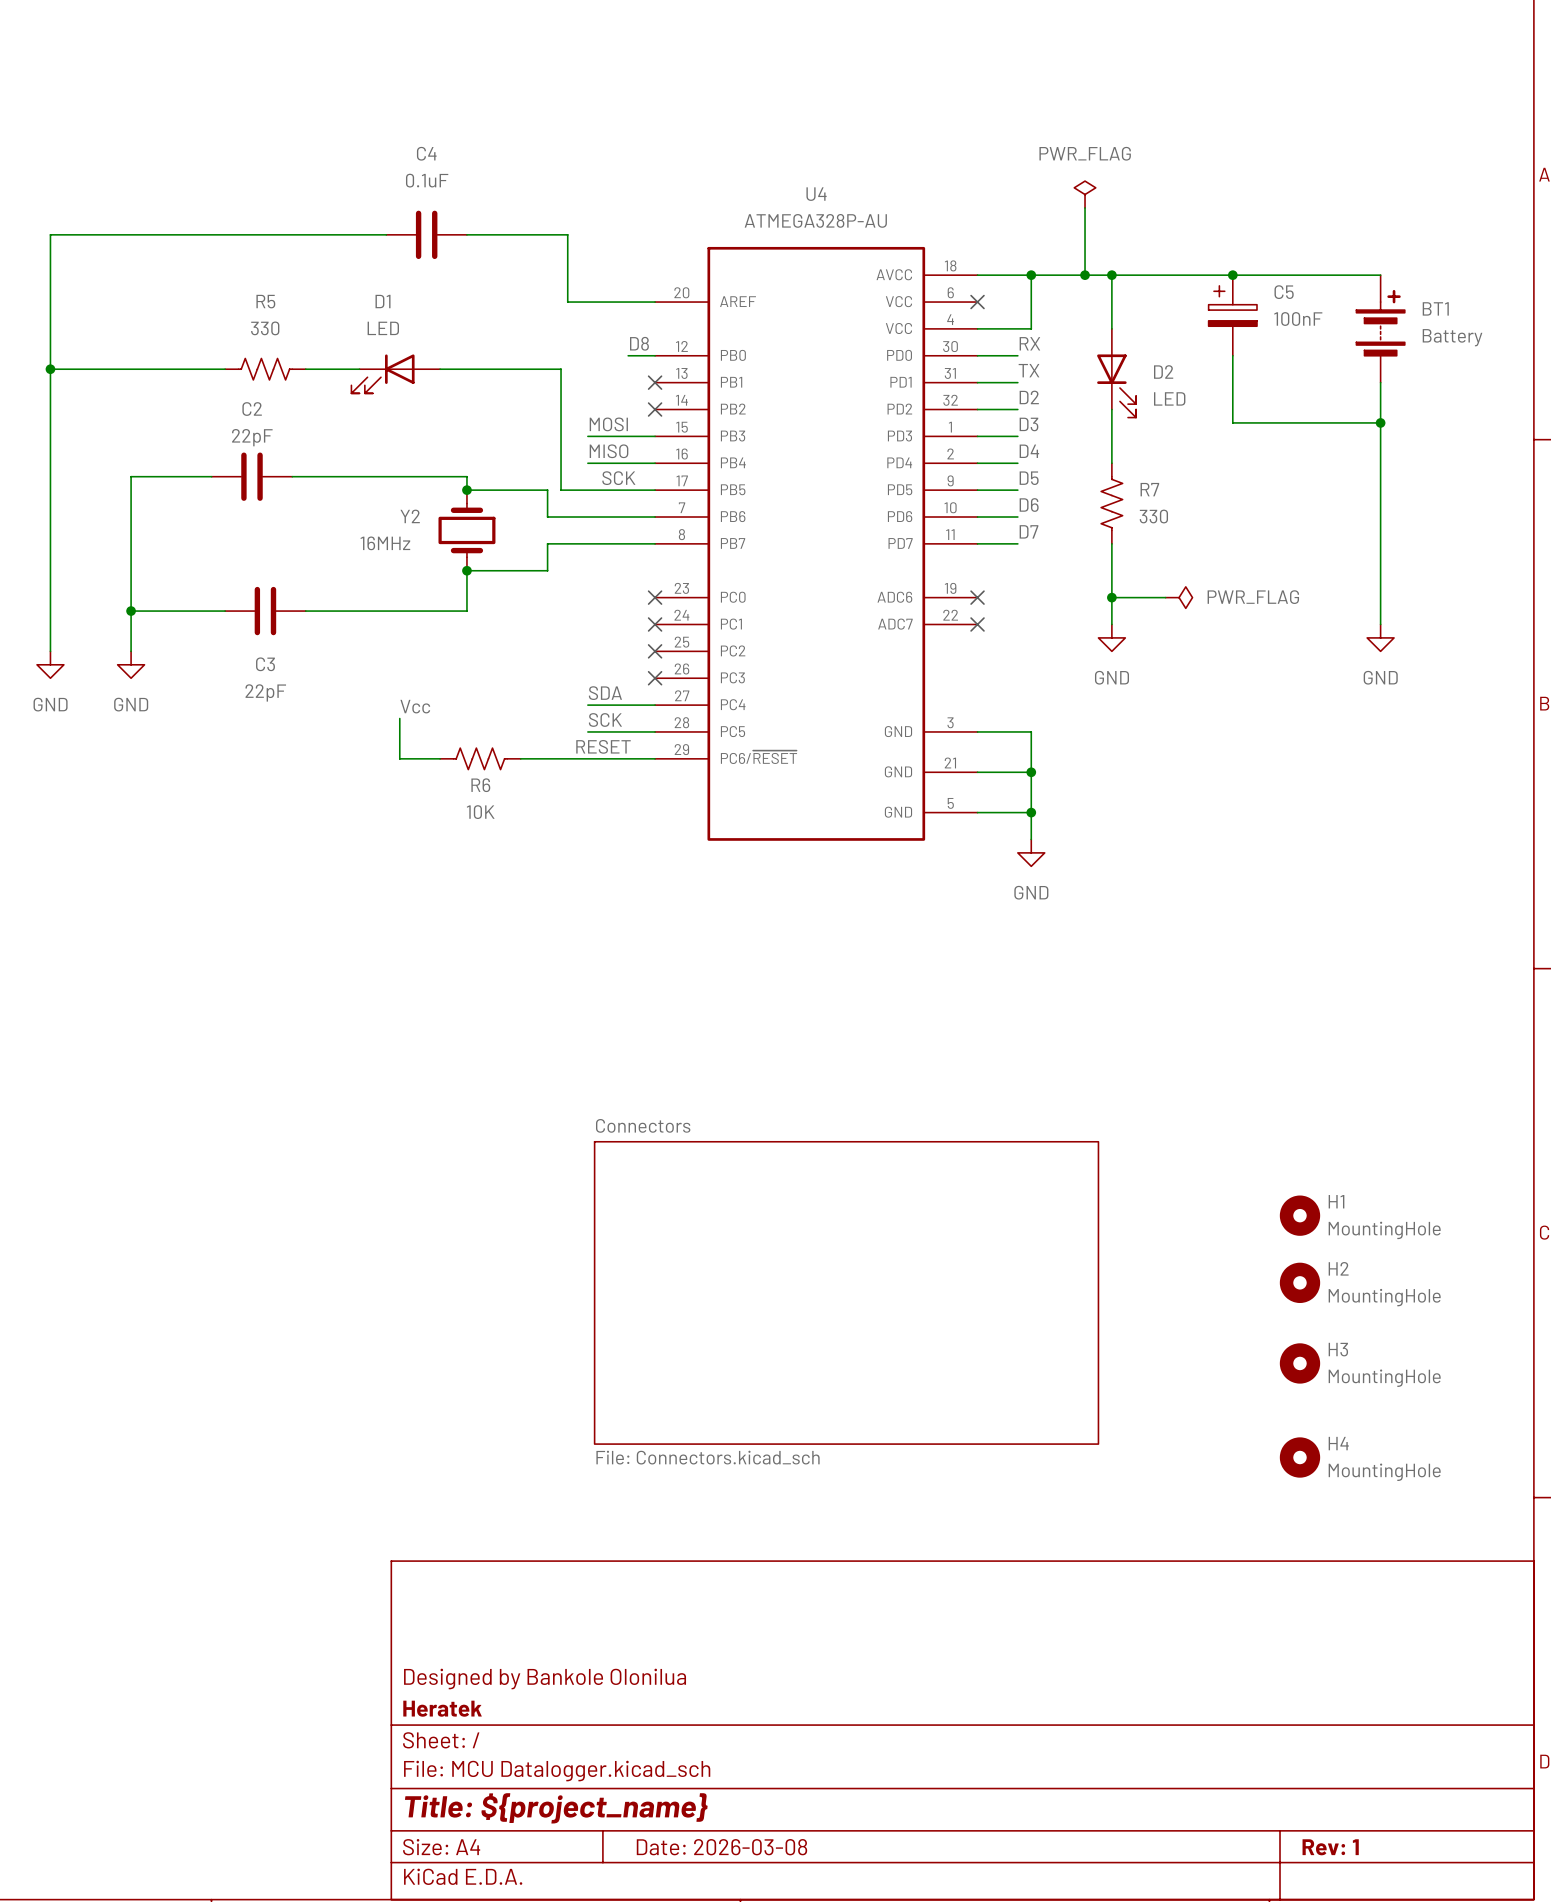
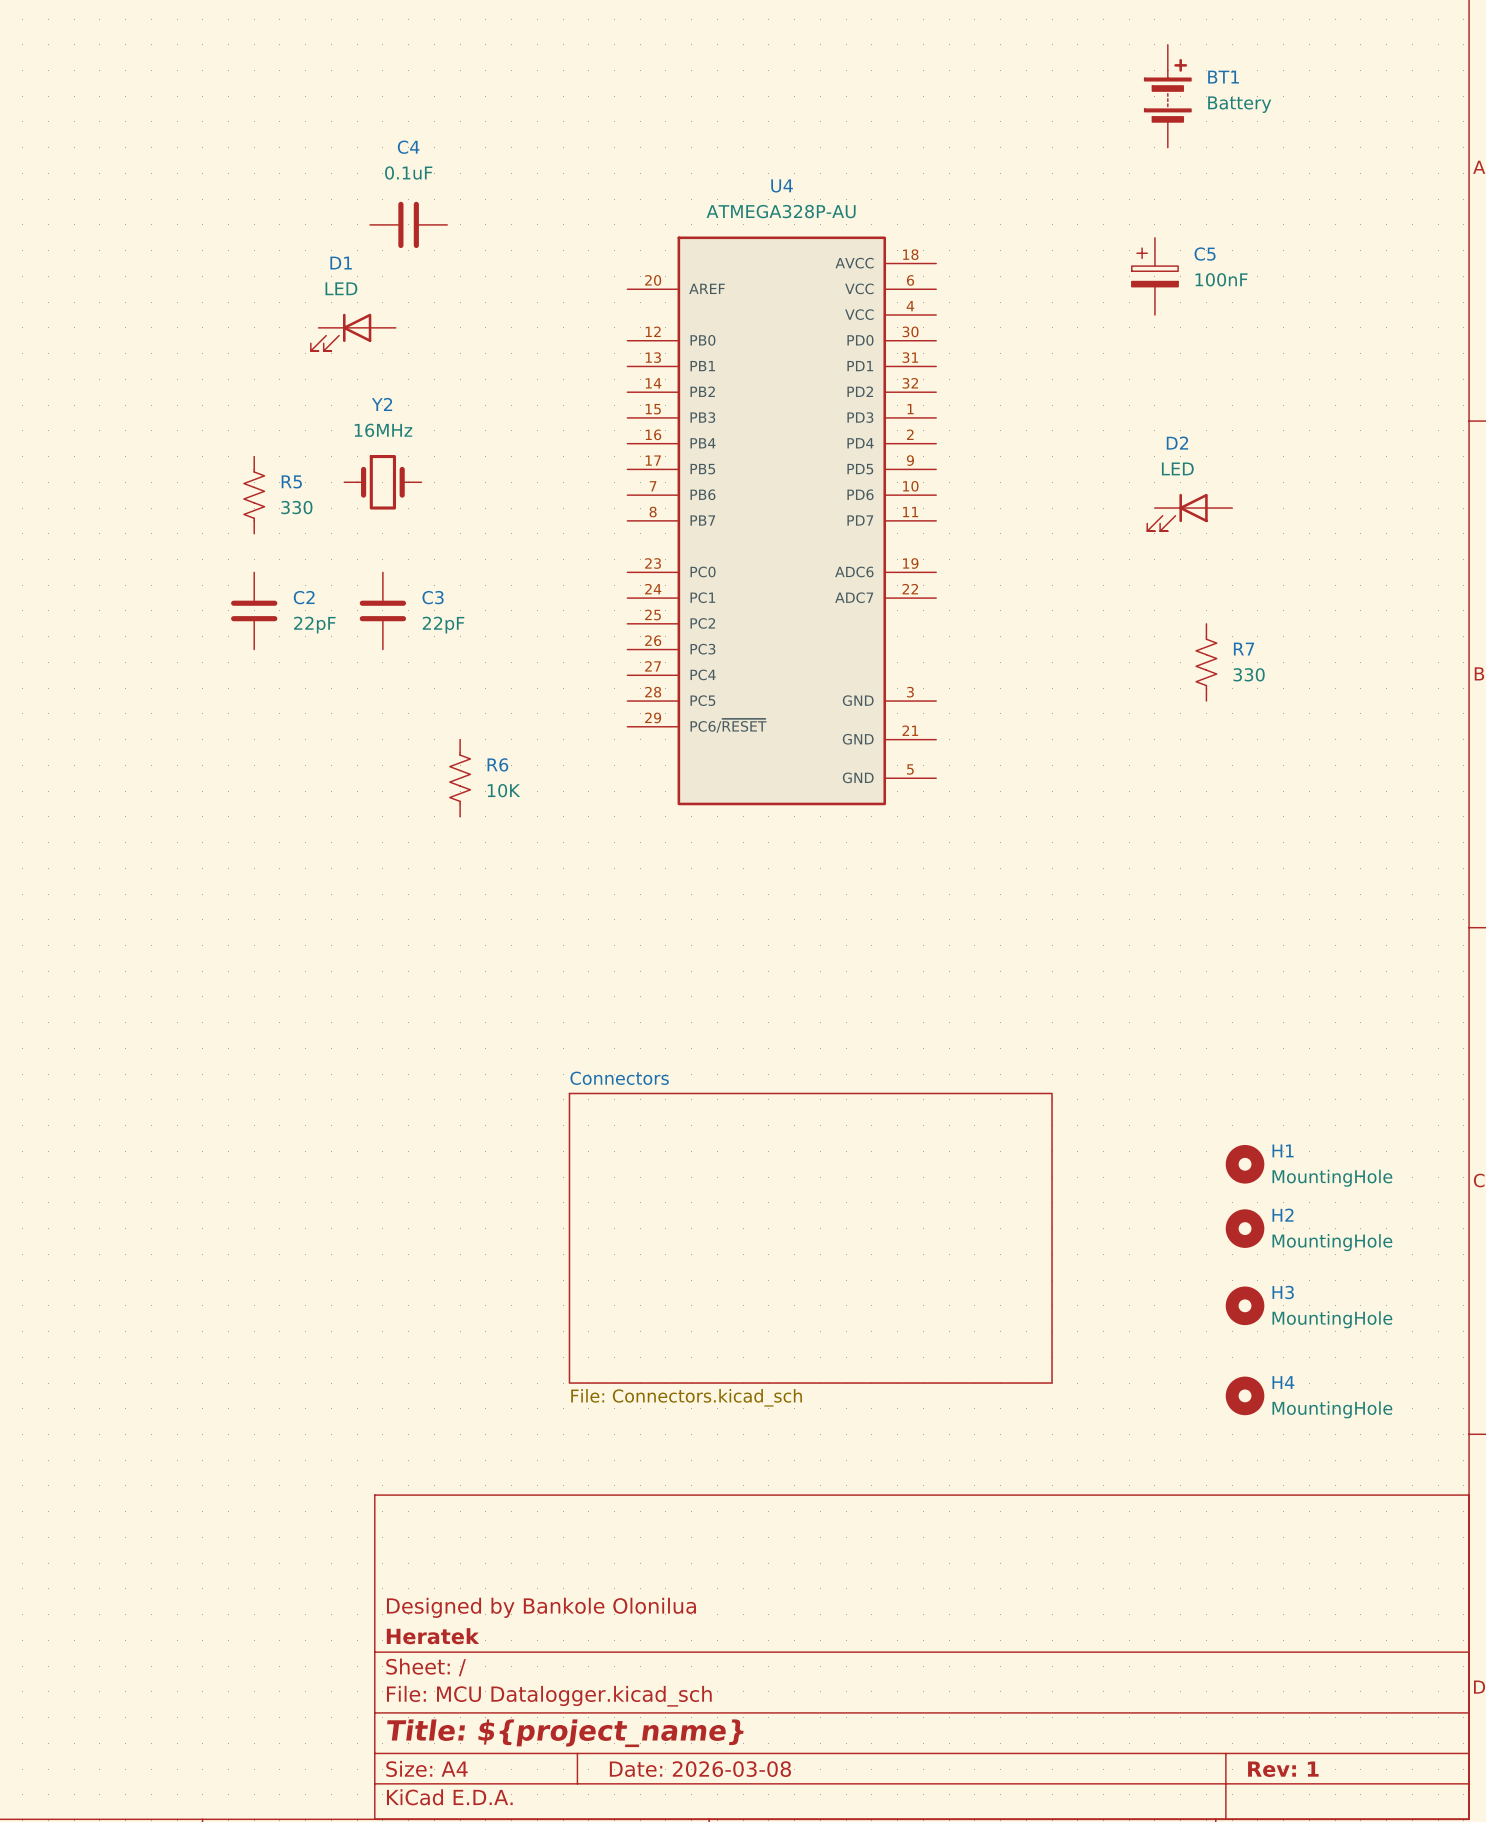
power symbol: PWR_FLAG (1085, 194) -> none
wire: (1085, 207) (1085, 275) -> none
wire: (386, 234) (50, 234) (50, 651) -> none
wire: (466, 234) (567, 234) (567, 302) (655, 302) -> none
wire: (977, 275) (1380, 275) -> none
wire: (1031, 275) (1031, 328) (977, 328) -> none
junction: (1031, 275) -> none
junction: (1085, 275) -> none
wire: (1111, 275) (1111, 328) -> none
junction: (1111, 275) -> none
junction: (1232, 275) -> none
R5 name position: R5 (265, 301) -> R5 (291, 481)
no-connect mark: (977, 302) -> none
C5 position: (1232, 315) -> (1154, 276)
BT1 position: (1380, 328) -> (1167, 96)
label: D8 (639, 343) -> none
label: RX (1029, 343) -> none
wire: (628, 355) (655, 355) -> none
wire: (977, 355) (1017, 355) -> none
wire: (1232, 355) (1232, 422) (1380, 422) -> none
wire: (50, 369) (225, 369) -> none
junction: (50, 369) -> none
R5 rotation: 0° (265, 369) -> 90° clockwise (254, 495)
R5 position: (265, 369) -> (254, 495)
wire: (305, 369) (359, 369) -> none
wire: (440, 369) (561, 369) (561, 490) (655, 490) -> none
label: TX (1029, 370) -> none
D2 name position: D2 (1163, 371) -> D2 (1177, 443)
D1 position: (395, 373) -> (353, 332)
D2 position: (1116, 373) -> (1189, 512)
no-connect mark: (655, 382) -> none
wire: (977, 382) (1017, 382) -> none
wire: (1380, 382) (1380, 624) -> none
D2 rotation: 0° (1116, 386) -> 90° clockwise (1177, 512)
label: D2 (1029, 397) -> none
D2 value position: LED (1169, 398) -> LED (1177, 468)
no-connect mark: (655, 409) -> none
wire: (977, 409) (1017, 409) -> none
wire: (1111, 409) (1111, 463) -> none
junction: (1380, 422) -> none
label: MOSI (608, 424) -> none
label: D3 (1028, 424) -> none
wire: (587, 436) (655, 436) -> none
wire: (977, 436) (1017, 436) -> none
C2 value position: 22pF (252, 437) -> 22pF (314, 625)
label: MISO (609, 451) -> none
label: D4 (1029, 451) -> none
wire: (587, 463) (655, 463) -> none
wire: (977, 463) (1017, 463) -> none
wire: (211, 476) (131, 476) (131, 651) -> none
C2 rotation: 0° (251, 476) -> 90° clockwise (254, 610)
C2 position: (251, 476) -> (254, 610)
wire: (292, 476) (466, 476) (466, 490) (547, 490) (547, 517) (655, 517) -> none
label: SCK (618, 478) -> none
label: D5 (1029, 478) -> none
junction: (466, 490) -> none
wire: (977, 490) (1017, 490) -> none
R7 position: (1111, 503) -> (1206, 662)
label: D6 (1029, 505) -> none
Y2 name position: Y2 (410, 516) -> Y2 (381, 404)
wire: (977, 517) (1017, 517) -> none
Y2 rotation: 0° (466, 530) -> 90° clockwise (382, 482)
Y2 position: (466, 530) -> (382, 482)
label: D7 (1029, 531) -> none
wire: (655, 543) (547, 543) (547, 570) (466, 570) (466, 611) (305, 611) -> none
wire: (977, 543) (1017, 543) -> none
wire: (1111, 543) (1111, 624) -> none
junction: (466, 570) -> none
no-connect mark: (655, 597) -> none
no-connect mark: (977, 597) -> none
wire: (1111, 597) (1165, 597) -> none
junction: (1111, 597) -> none
power symbol: PWR_FLAG (1179, 597) -> none
wire: (131, 611) (225, 611) -> none
junction: (131, 611) -> none
C3 rotation: 0° (265, 611) -> 90° clockwise (382, 610)
C3 position: (265, 611) -> (382, 610)
no-connect mark: (655, 624) -> none
no-connect mark: (977, 624) -> none
power symbol: GND (1111, 637) -> none
power symbol: GND (1380, 637) -> none
no-connect mark: (655, 651) -> none
power symbol: GND (50, 664) -> none
power symbol: GND (131, 664) -> none
C3 name position: C3 (265, 664) -> C3 (433, 597)
no-connect mark: (655, 678) -> none
C3 value position: 22pF (265, 692) -> 22pF (443, 625)
label: SDA (605, 693) -> none
wire: (587, 705) (655, 705) -> none
label: Vcc (415, 706) -> none
wire: (399, 718) (399, 758) (440, 758) -> none
label: SCK (605, 719) -> none
wire: (587, 731) (655, 731) -> none
wire: (977, 731) (1031, 731) (1031, 839) -> none
label: RESET (603, 746) -> none
R6 rotation: 0° (480, 758) -> 90° clockwise (460, 778)
R6 position: (480, 758) -> (460, 778)
wire: (520, 758) (655, 758) -> none
wire: (977, 772) (1031, 772) -> none
junction: (1031, 772) -> none
R6 name position: R6 (480, 785) -> R6 (497, 764)
R6 value position: 10K (480, 812) -> 10K (504, 790)
wire: (977, 812) (1031, 812) -> none
junction: (1031, 812) -> none
power symbol: GND (1031, 852) -> none

